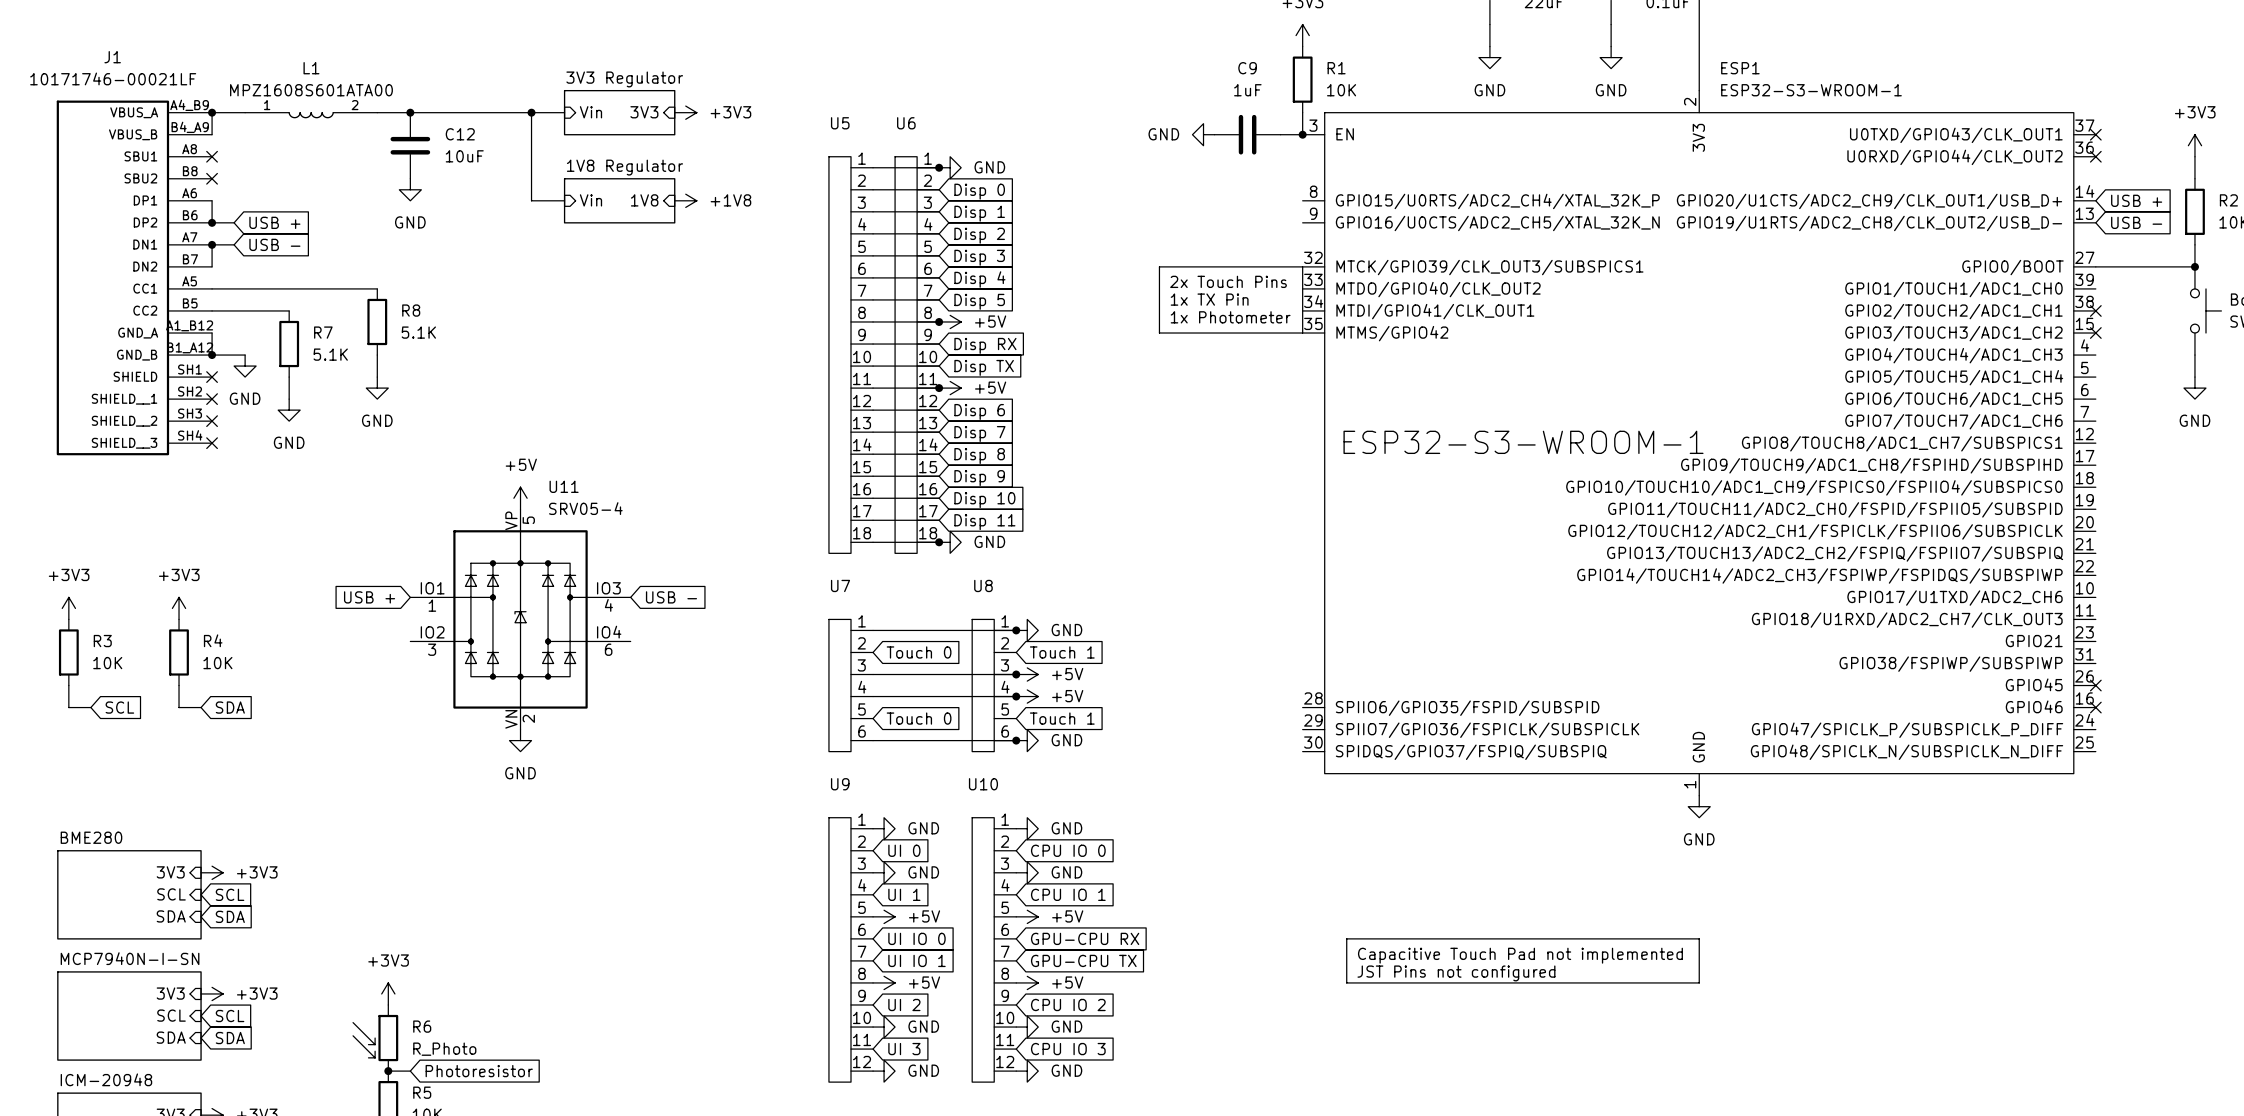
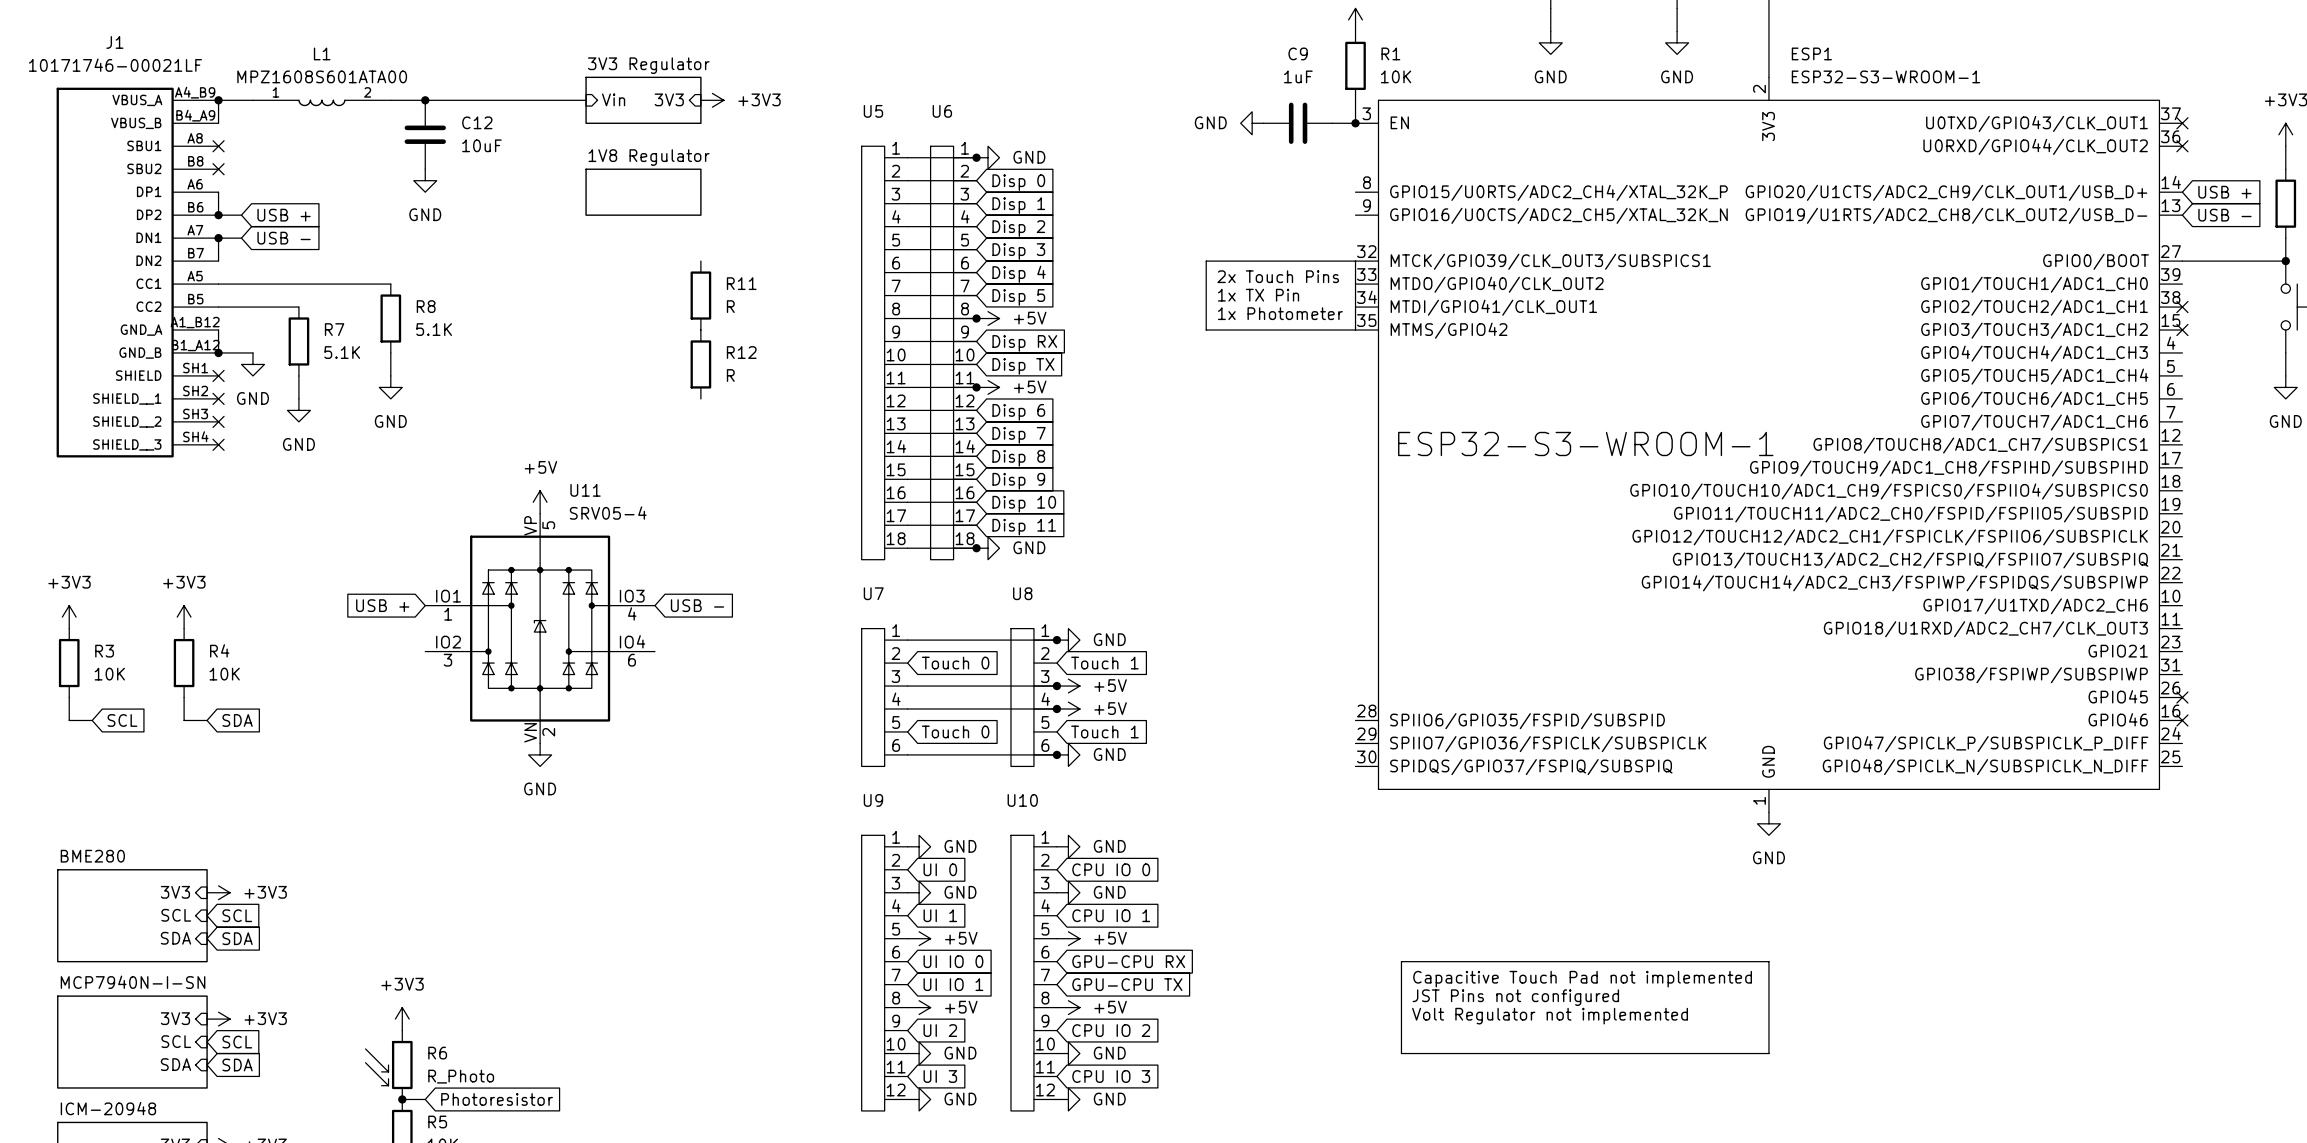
wire: (531, 112) (531, 200) (564, 200) -> none
junction: (531, 112) -> none
sheet pin: Vin (590, 200) -> none
sheet pin: 1V8 (644, 200) -> none
power symbol: +1V8 (685, 200) -> none
R11: none -> R (700, 295)
R12: none -> R (700, 364)
line: (1346, 982) (1699, 982) -> (1401, 1007) (1401, 1053) (1768, 1053) (1768, 1007)
text: none -> Volt Regulator not implemented (1550, 1016)

